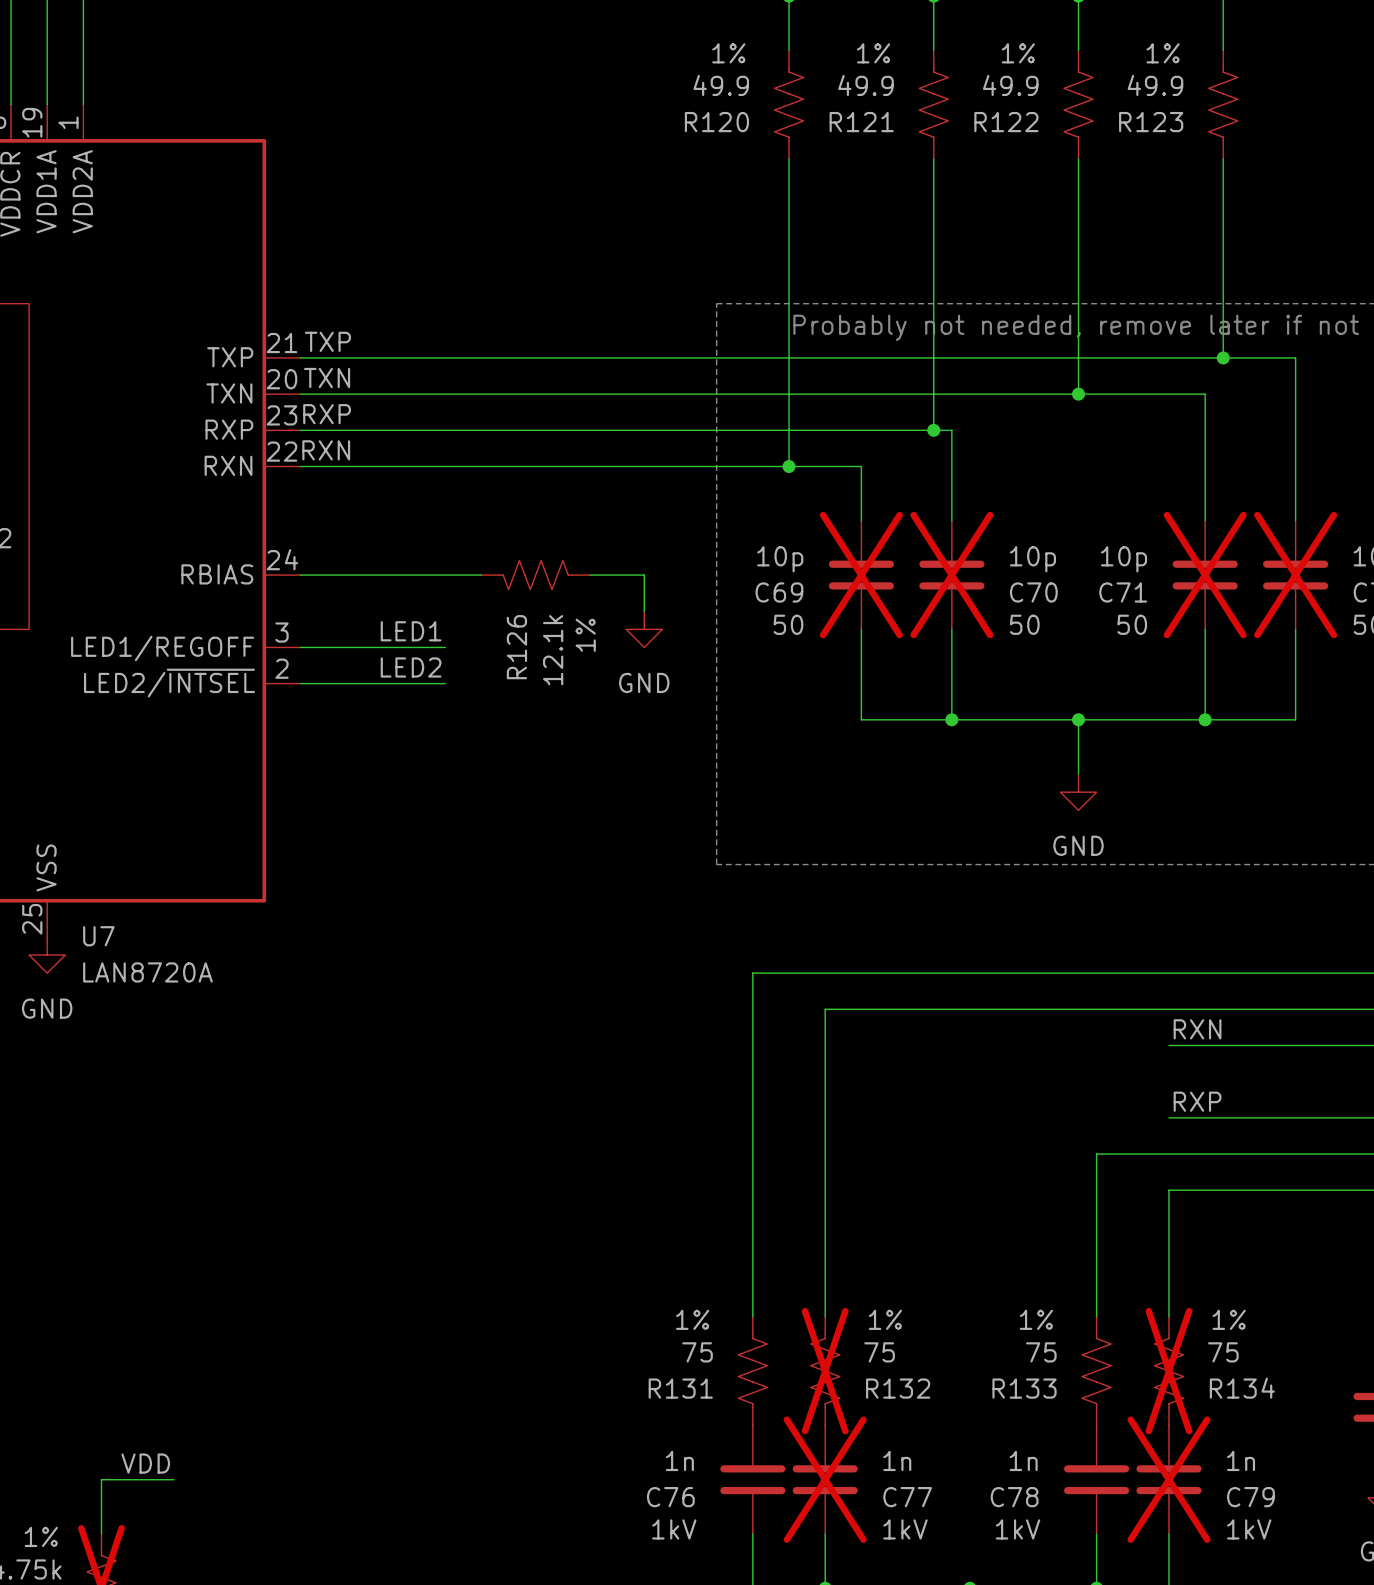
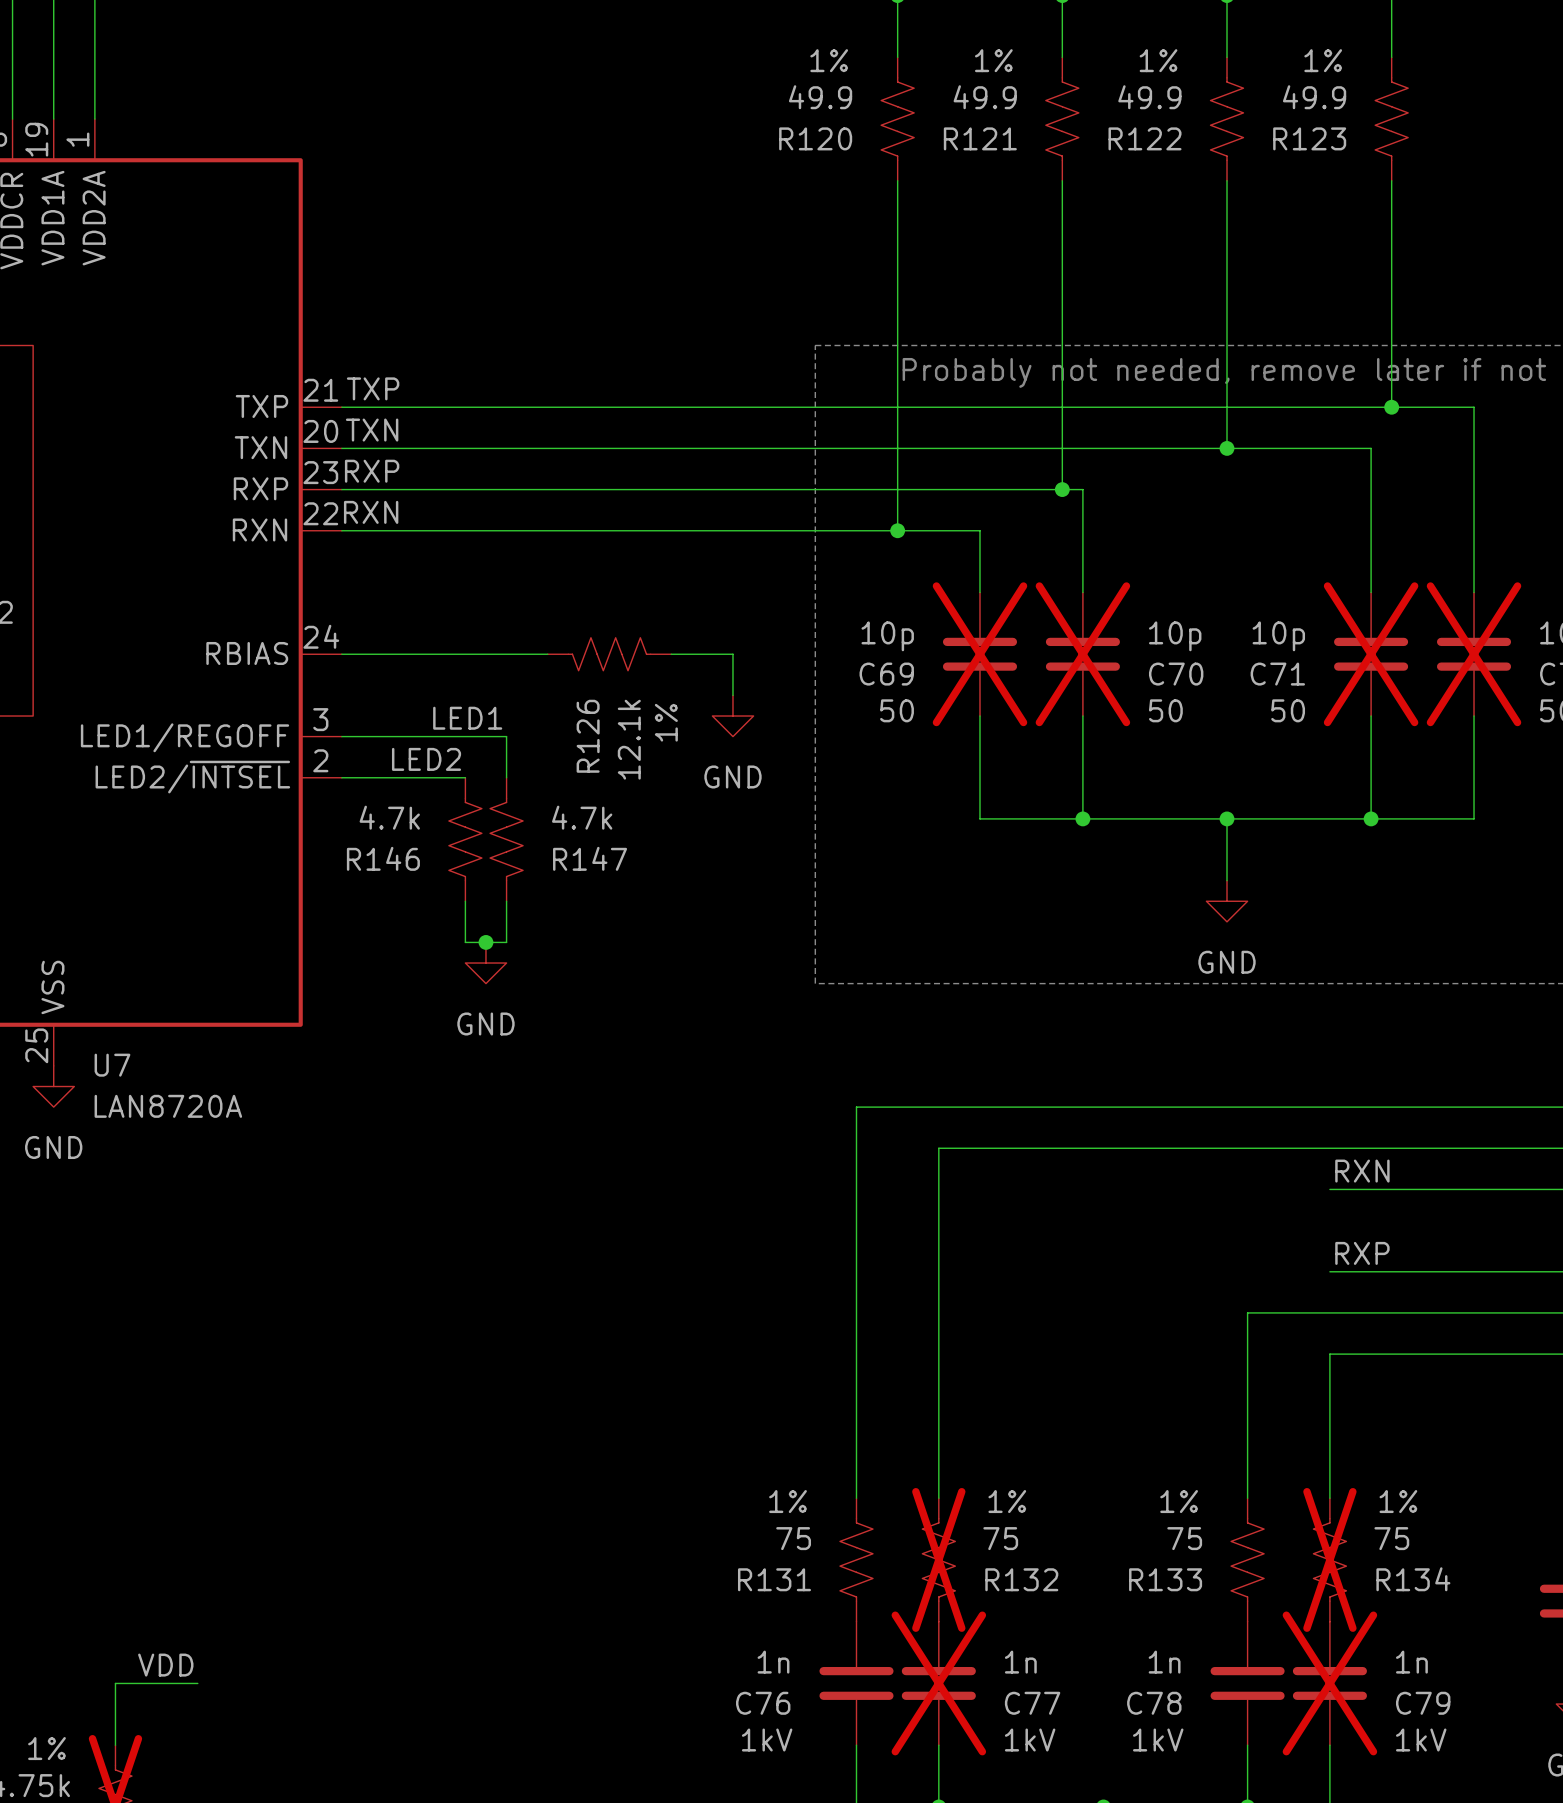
label position: LED2 (411, 667) -> LED2 (426, 759)
wire: (409, 683) (445, 683) -> (506, 736) (506, 777)
R146: none -> 4.7k (465, 839)
R147: none -> 4.7k (506, 839)
wire: none -> (465, 901) (465, 942) (506, 942) (506, 901)
junction: none -> (485, 942)
power symbol: none -> GND (485, 963)

